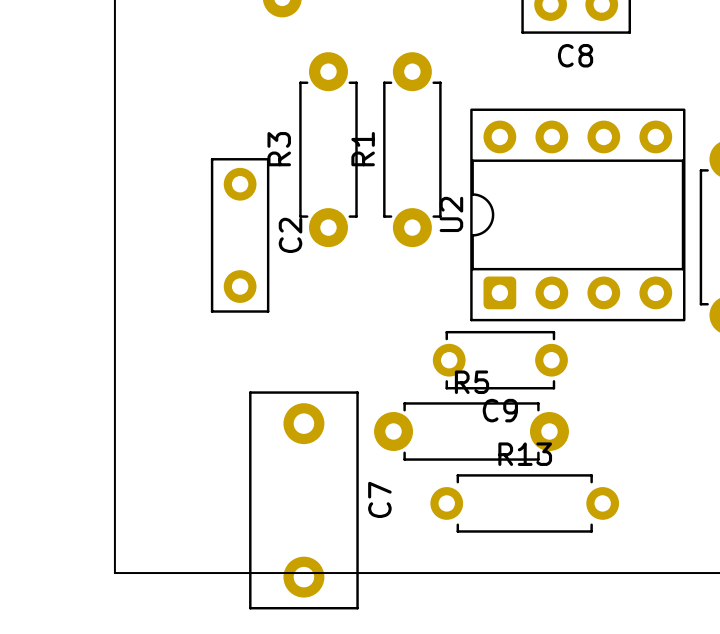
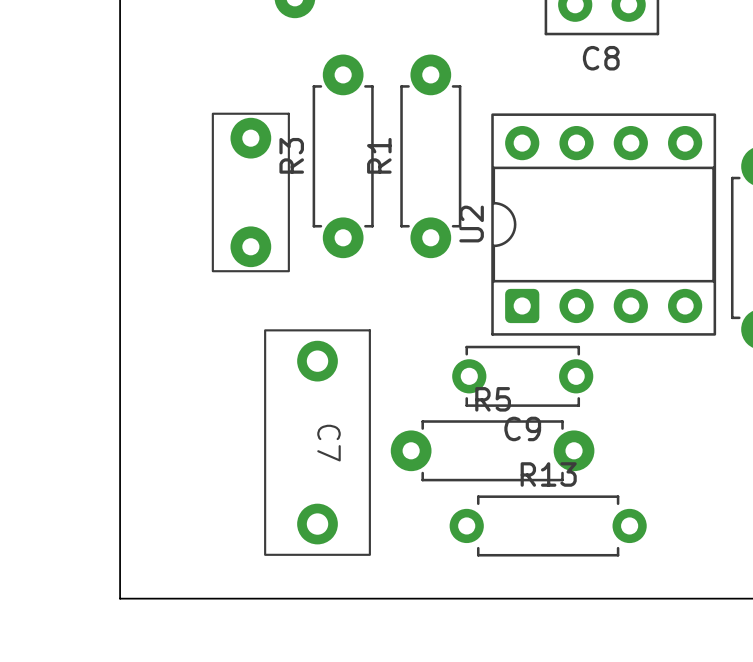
part: none -> (250, 192)
C2: (240, 235) -> none
C7 footprint: [249, 391, 359, 610] -> [264, 329, 371, 556]
C7 name position: C7 (379, 499) -> C7 (329, 443)

